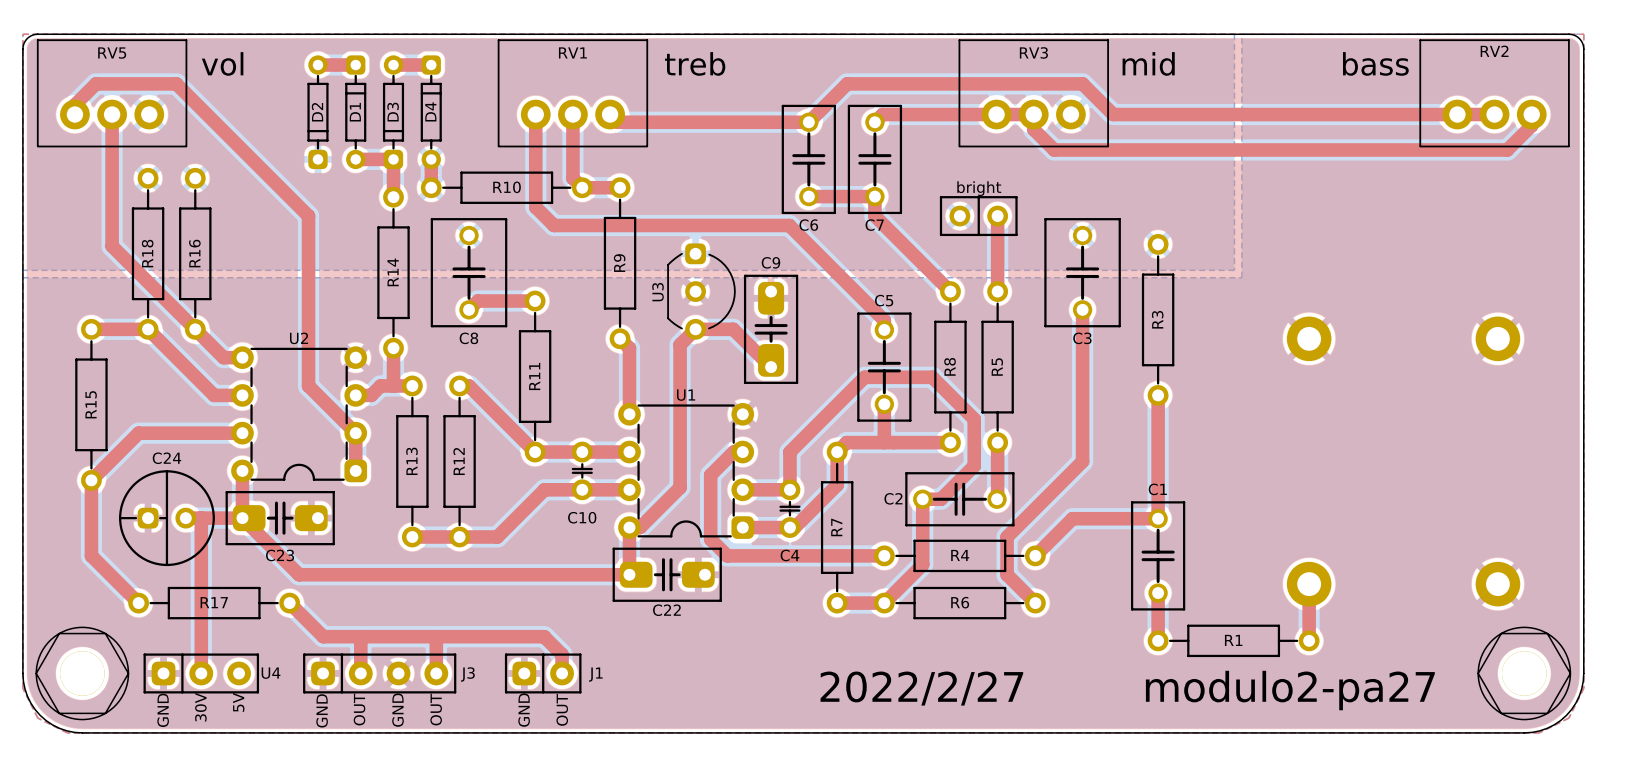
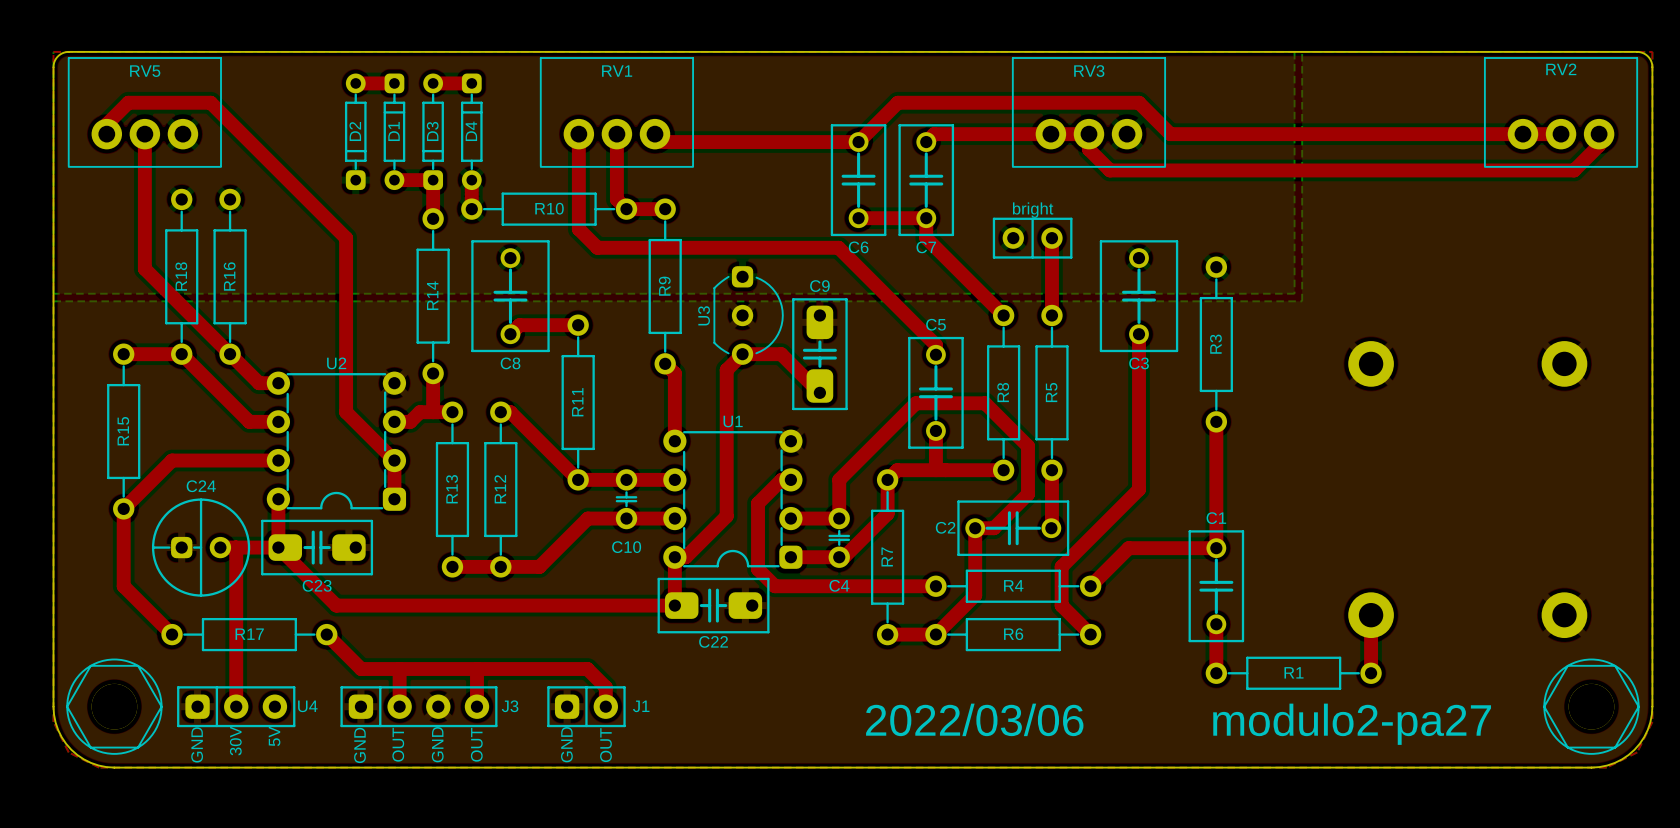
text: vol (222, 63) -> none
text: treb (695, 63) -> none
text: mid (1148, 63) -> none
text: bass (1375, 63) -> none
text: 2022/2/27 (921, 688) -> 2022/03/06 (974, 719)

